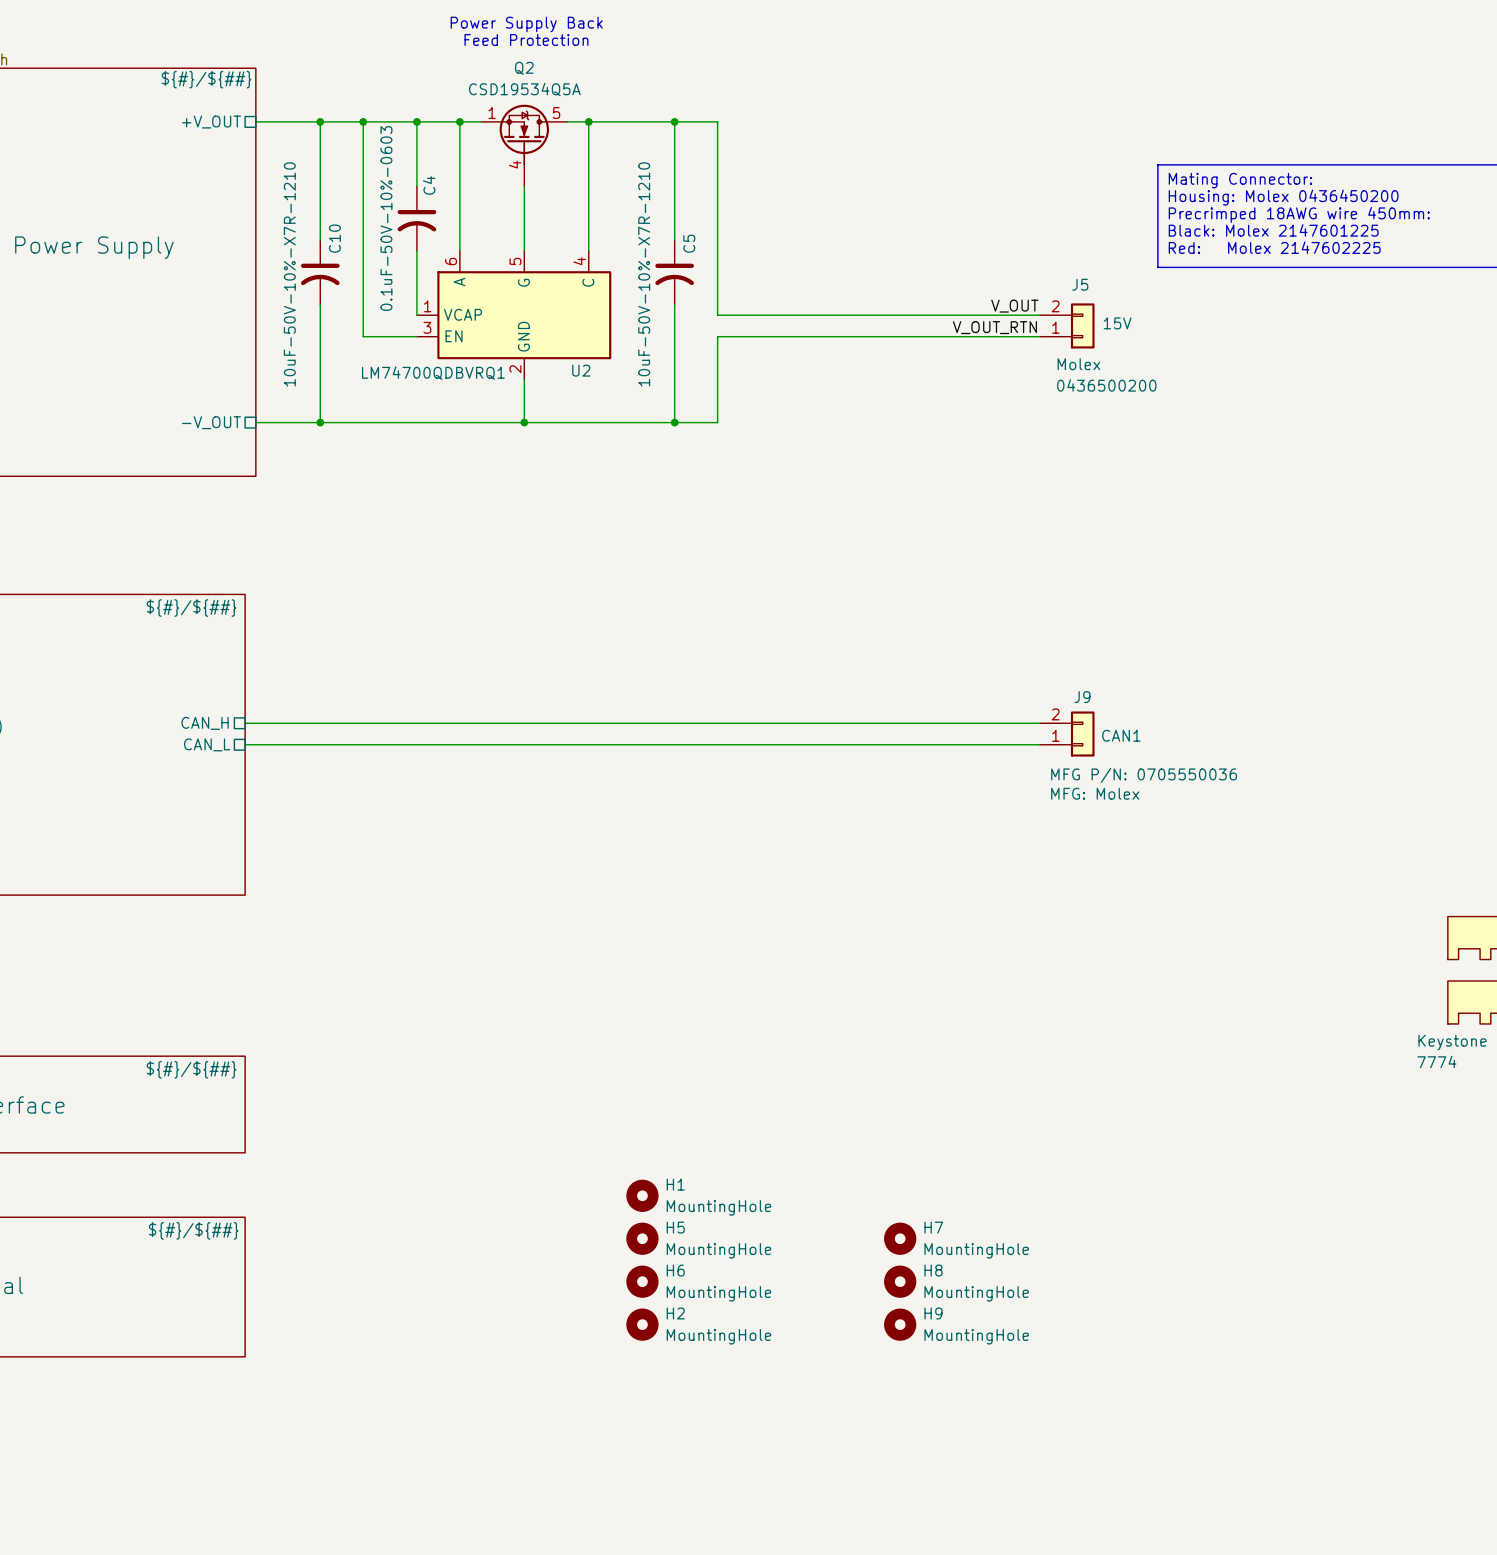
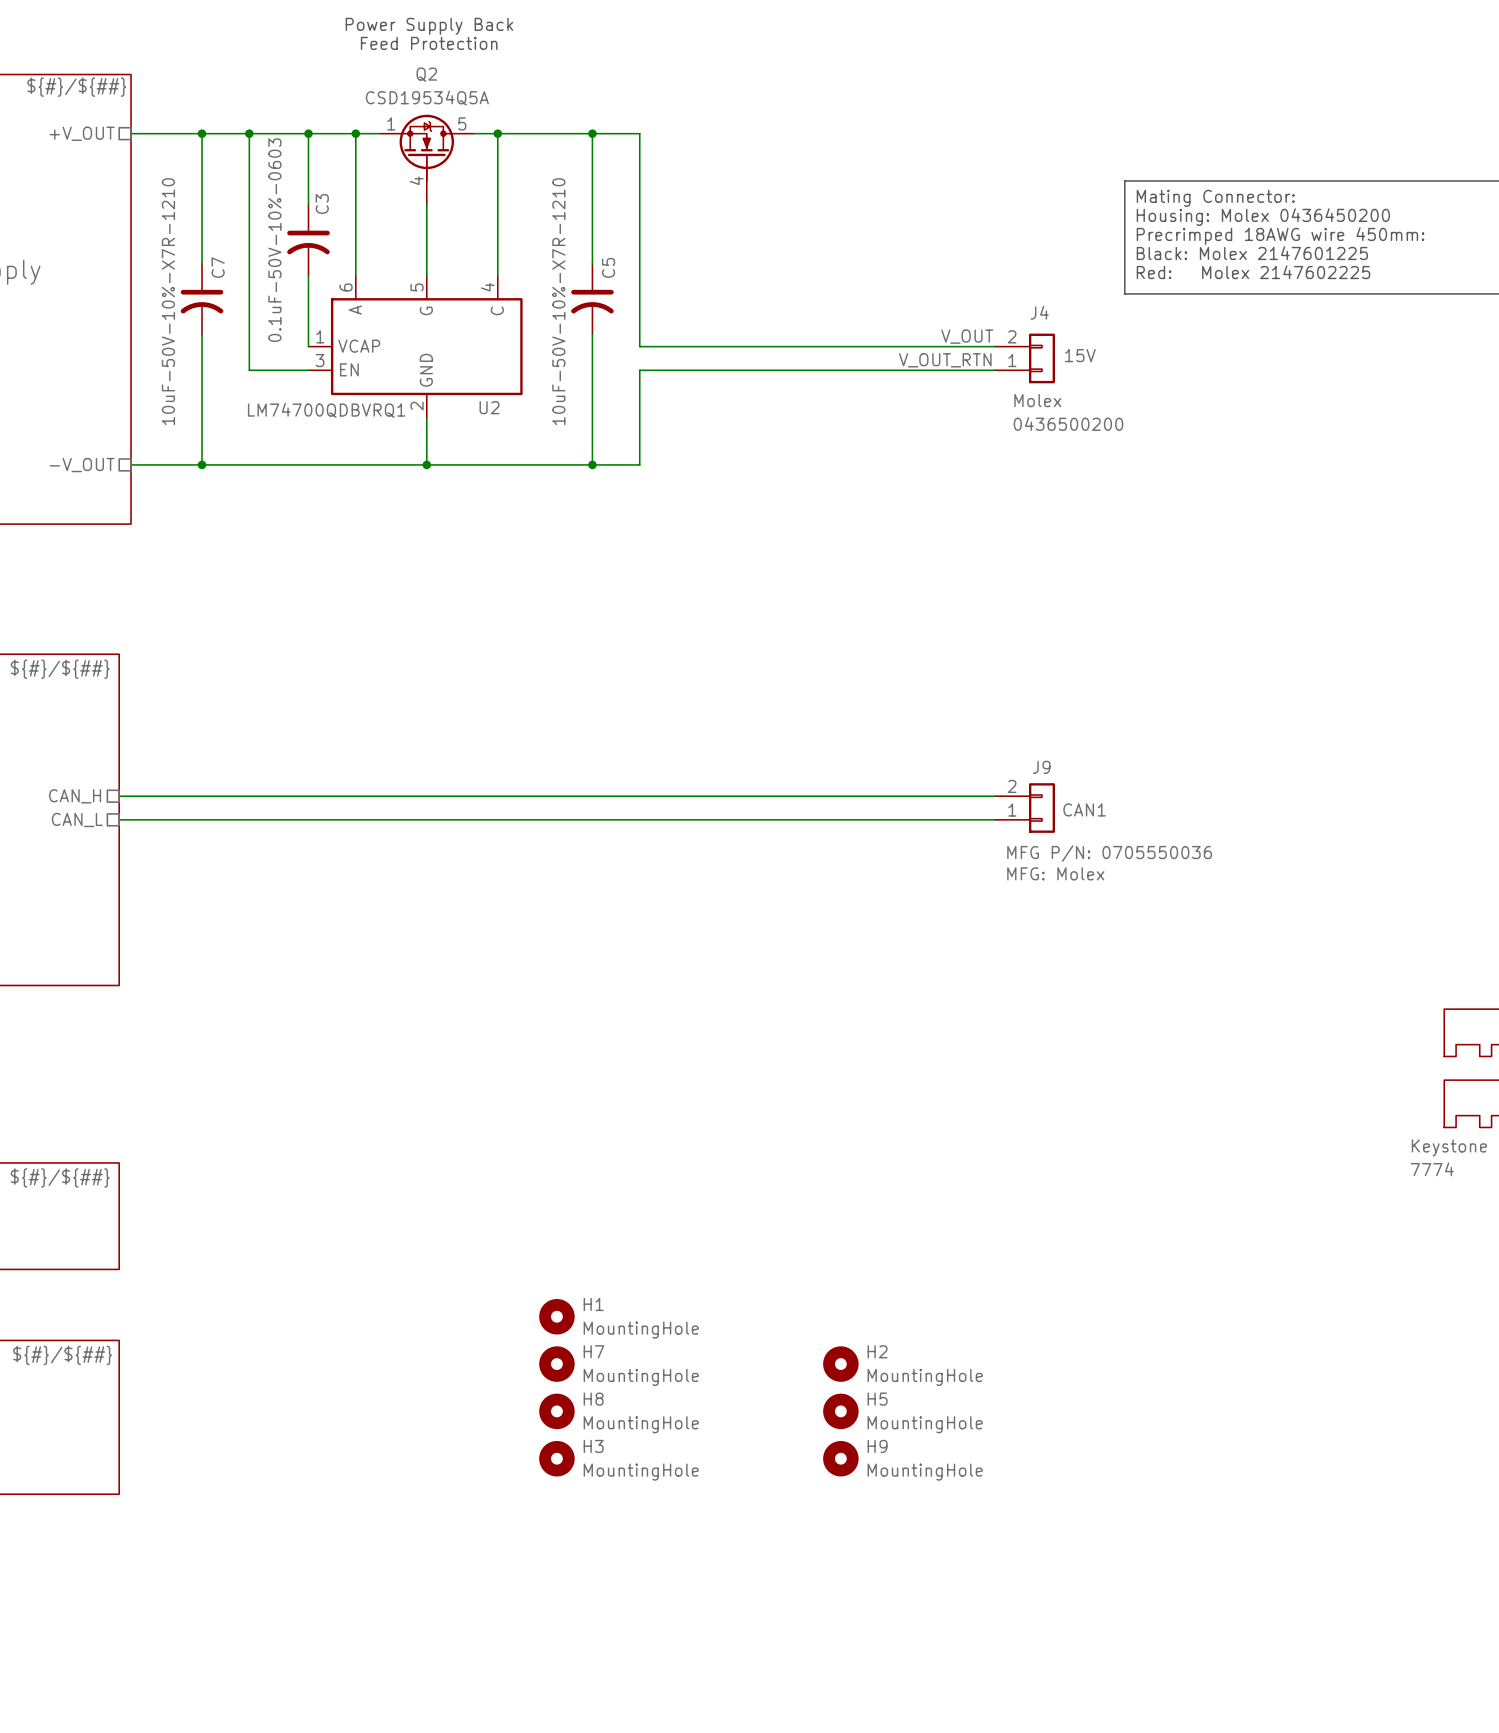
C4 name: C4 (429, 185) -> C3 (322, 204)
C10 name: C10 (334, 238) -> C7 (218, 267)
J5 name: J5 (1080, 284) -> J4 (1039, 312)
H5 name: H5 (675, 1227) -> H7 (593, 1351)
H7 name: H7 (933, 1227) -> H2 (877, 1351)
H6 name: H6 (675, 1270) -> H8 (593, 1399)
H8 name: H8 (933, 1270) -> H5 (877, 1399)
H2 name: H2 (675, 1313) -> H3 (593, 1446)

